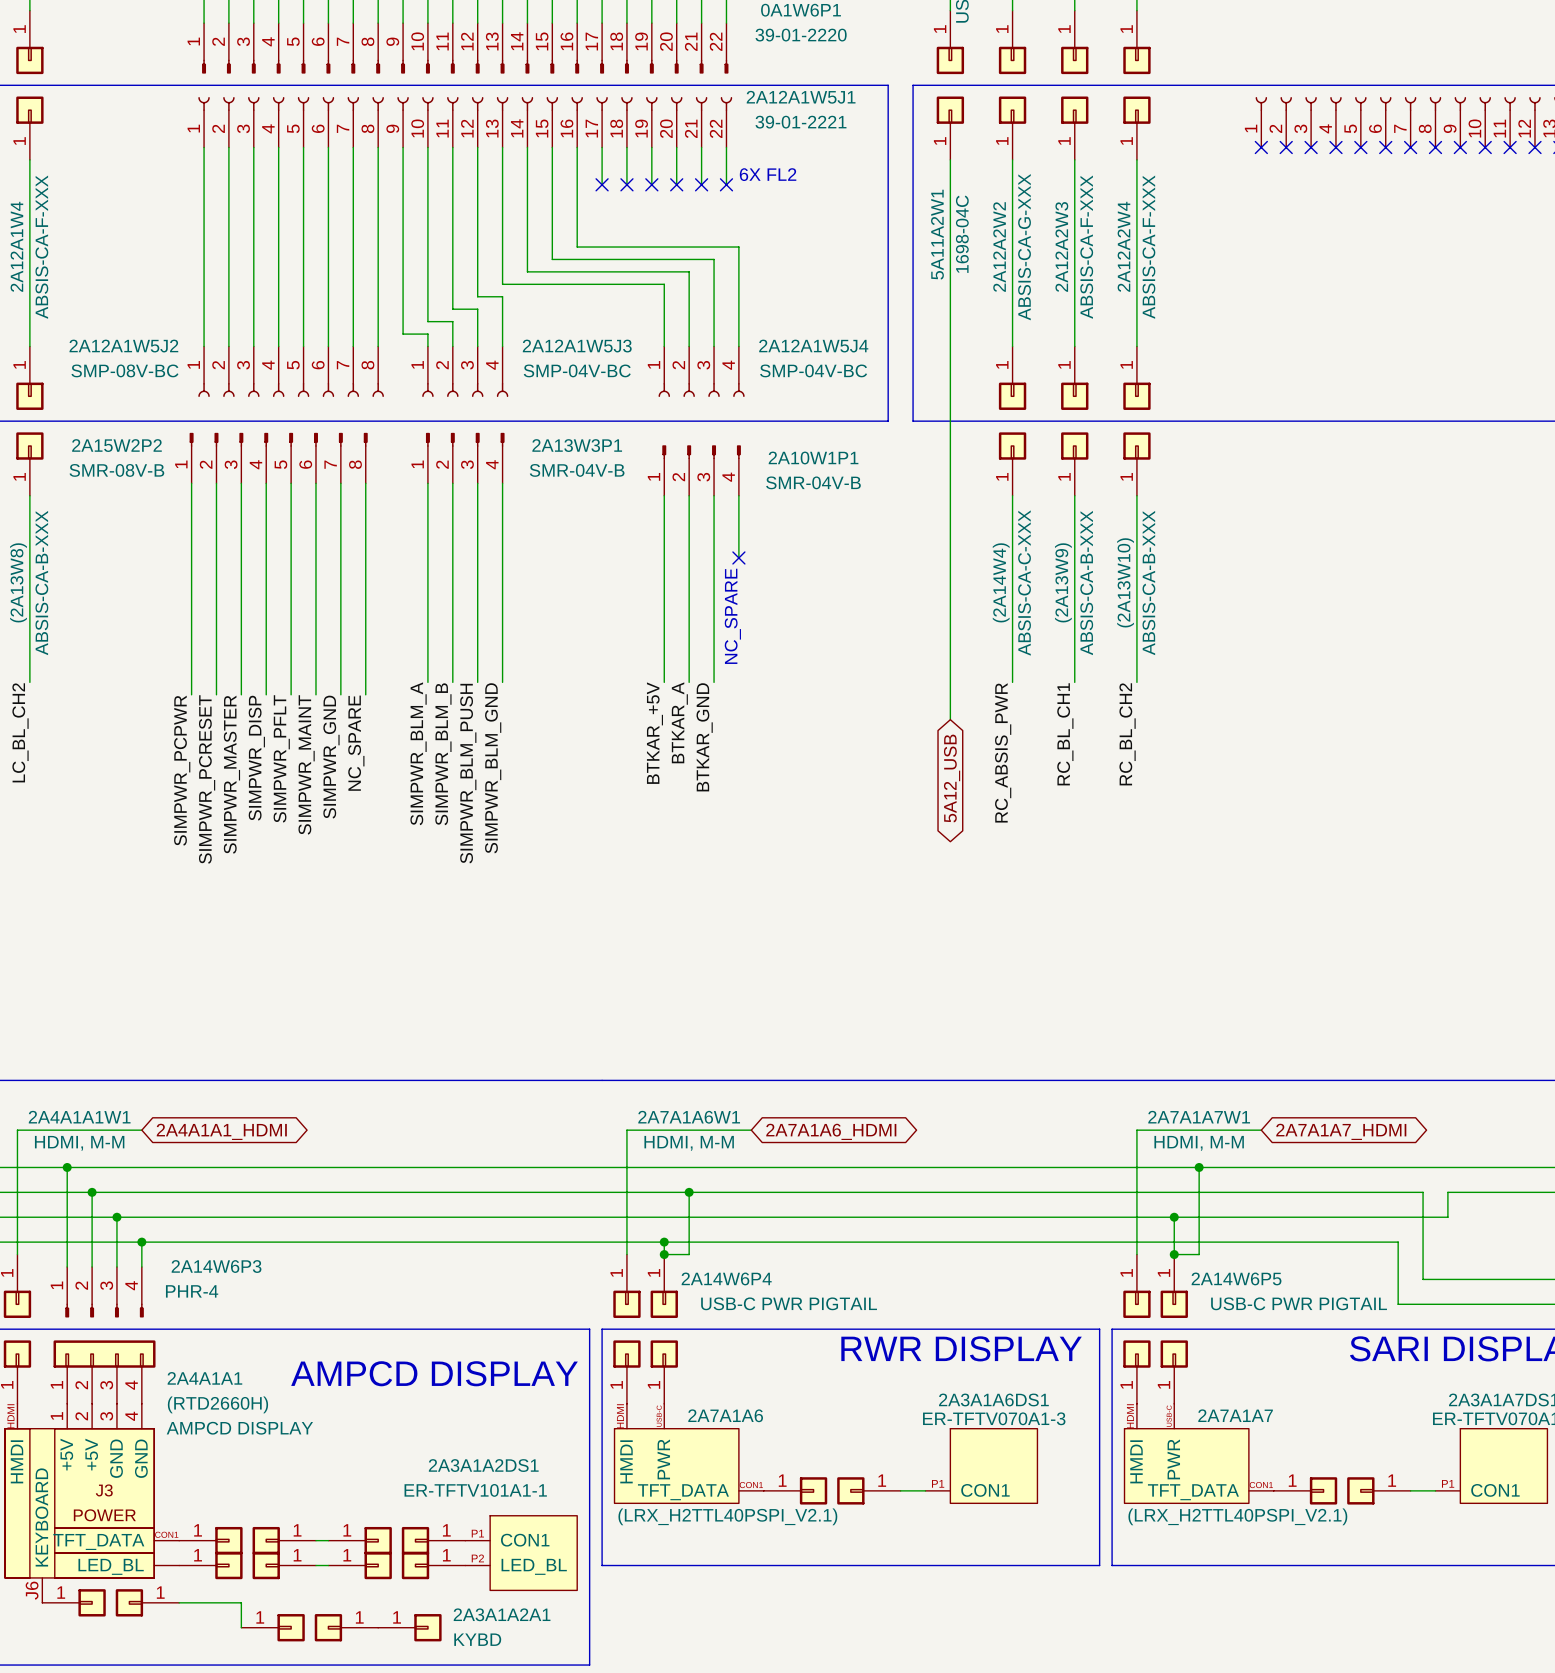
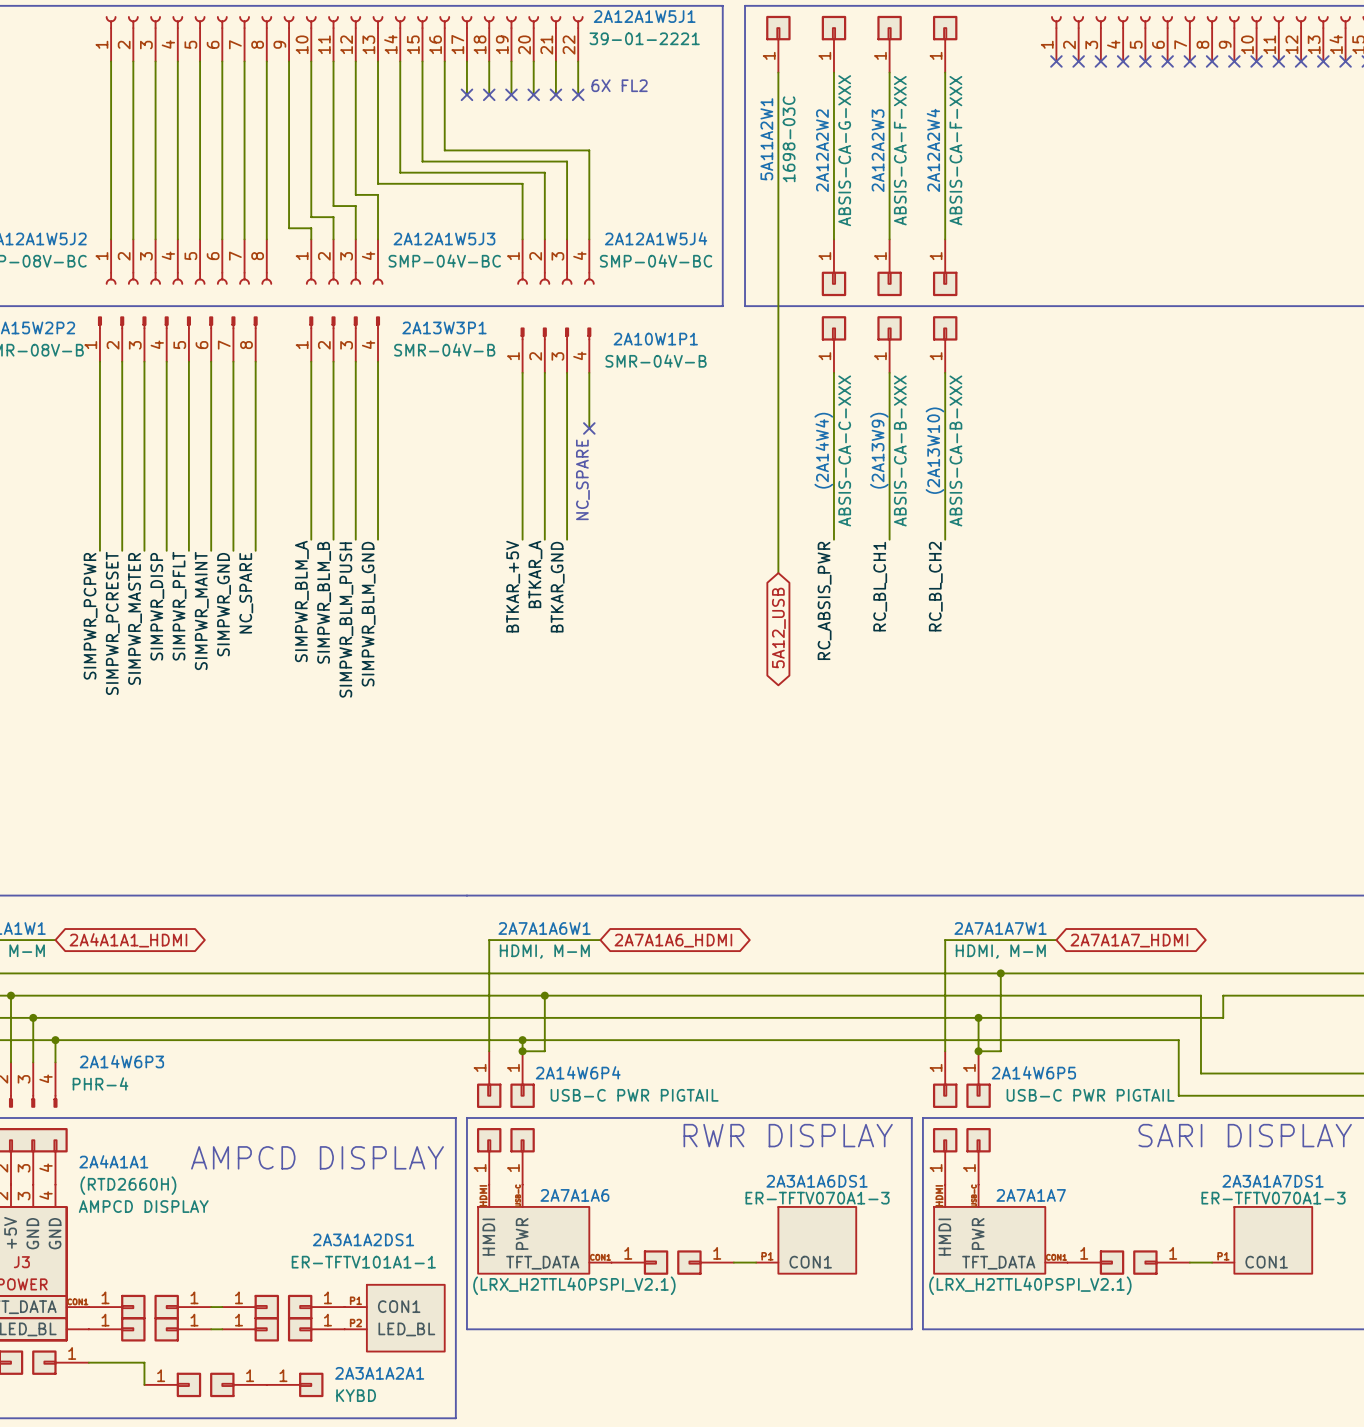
5A11A2W1 value: 1698-04C (962, 234) -> 1698-03C (789, 139)

